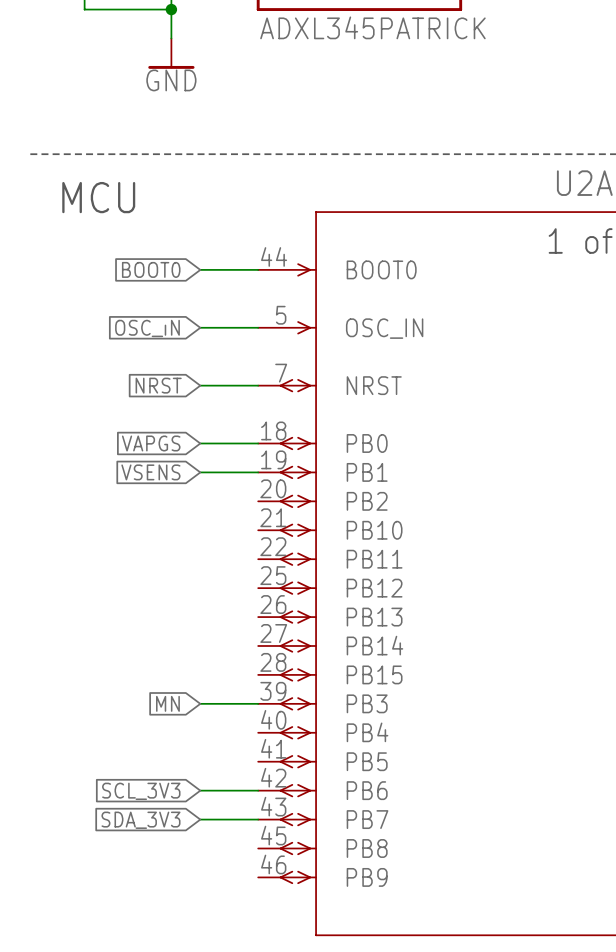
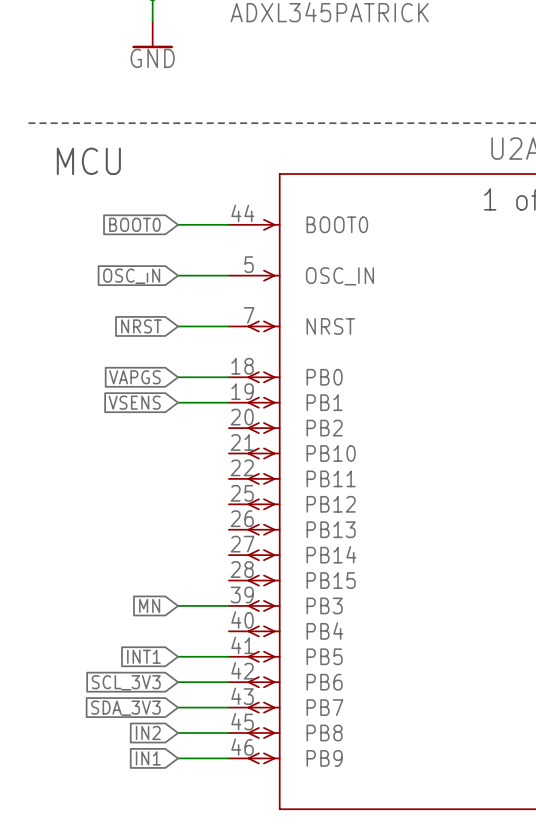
global label: none -> INT1 (143, 656)
wire: none -> (178, 656) (228, 656)
global label: none -> IN2 (148, 733)
wire: none -> (178, 733) (228, 733)
global label: none -> IN1 (148, 758)
wire: none -> (178, 758) (228, 758)

